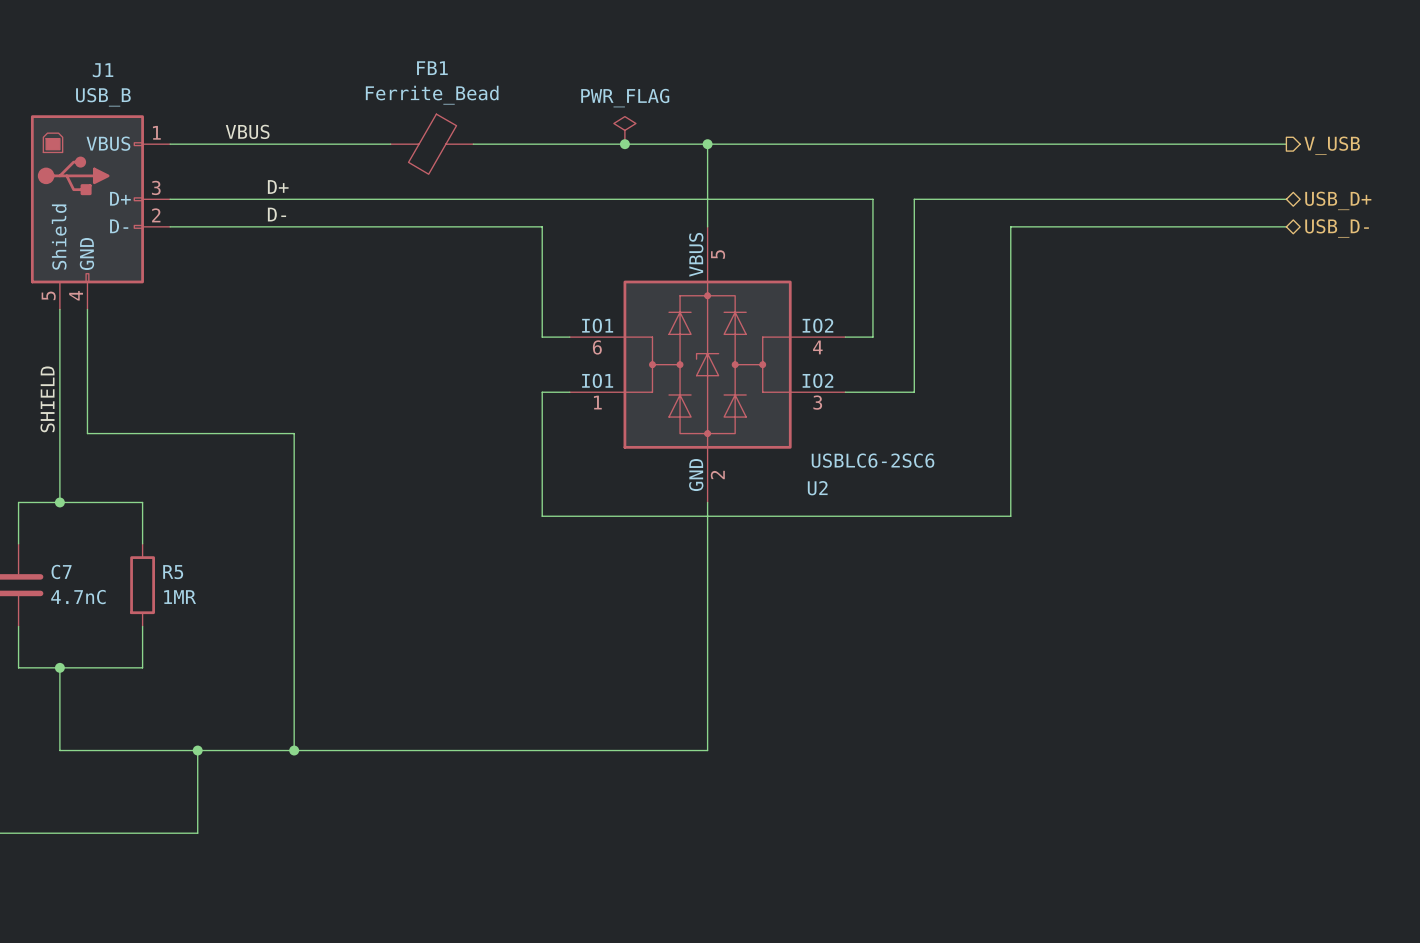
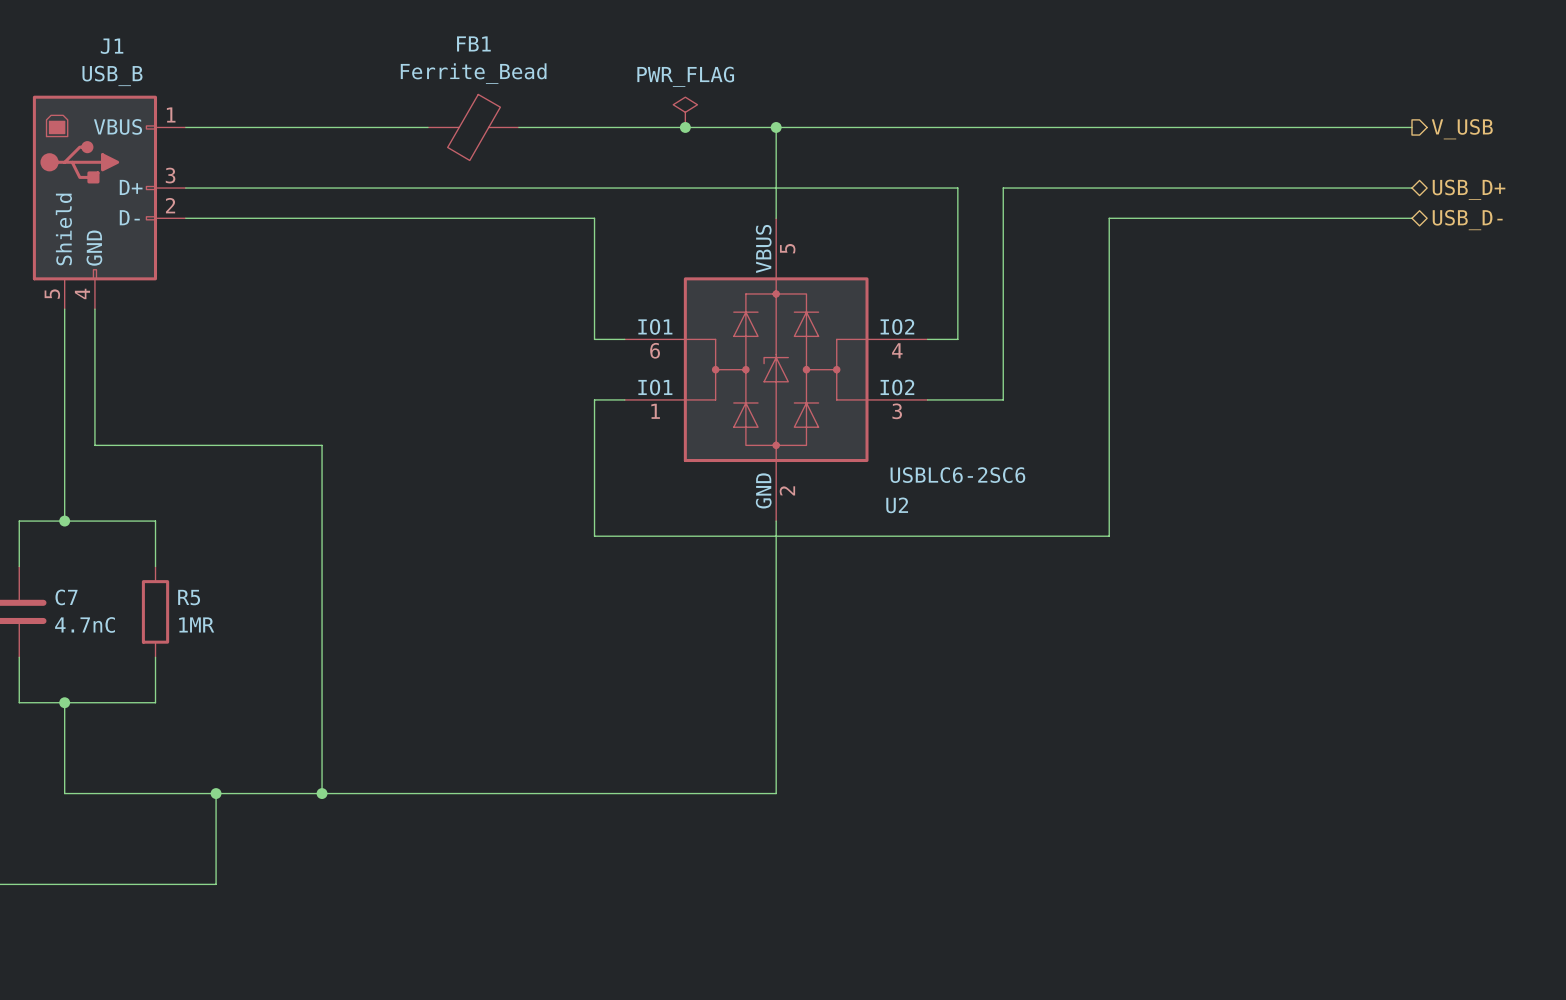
label: VBUS (247, 131) -> none
label: D+ (278, 187) -> none
label: D- (276, 214) -> none
label: SHIELD (47, 399) -> none

